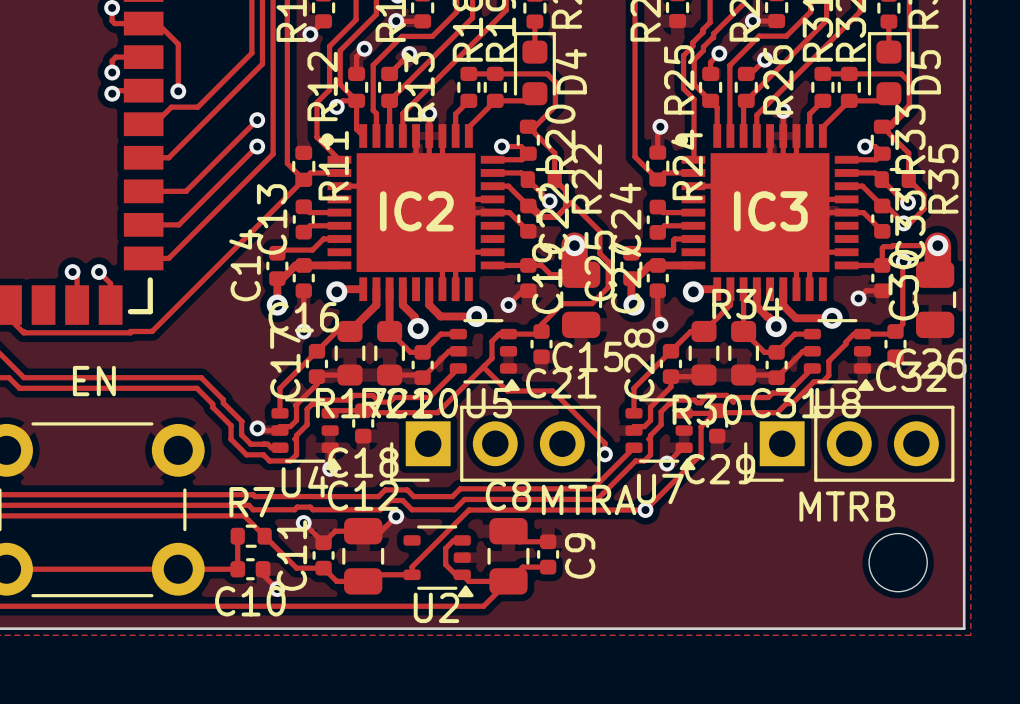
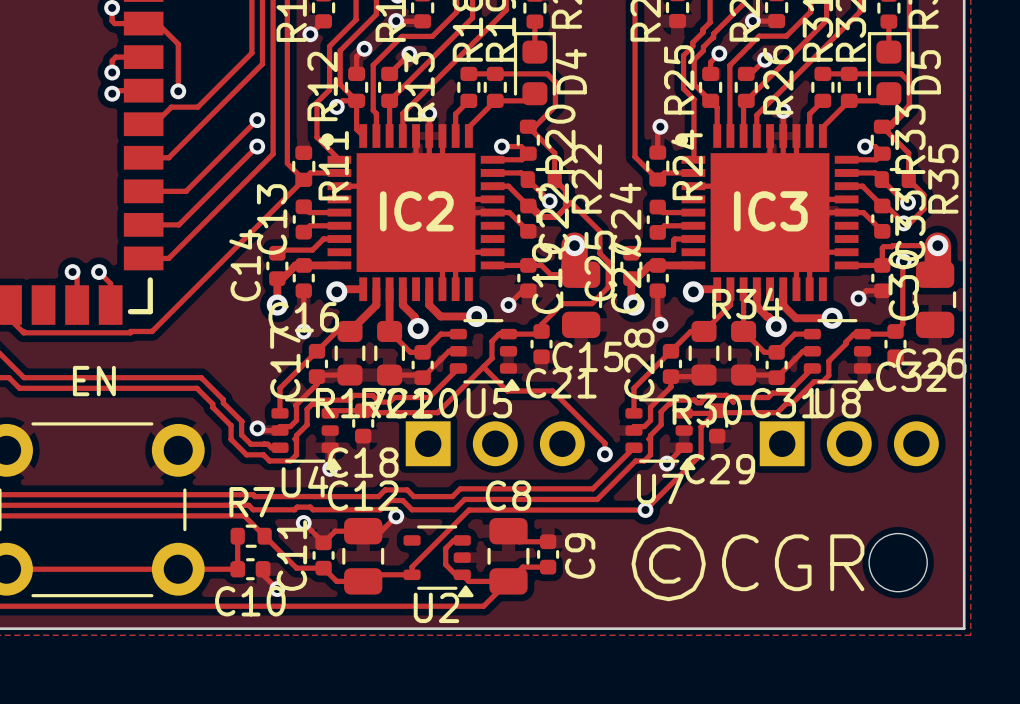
part side: top (495, 443) -> bottom (495, 443)
part side: top (849, 443) -> bottom (849, 443)
text: MTRA (589, 499) -> none
text: MTRB (847, 506) -> none
text: none -> ©CGR (747, 564)

